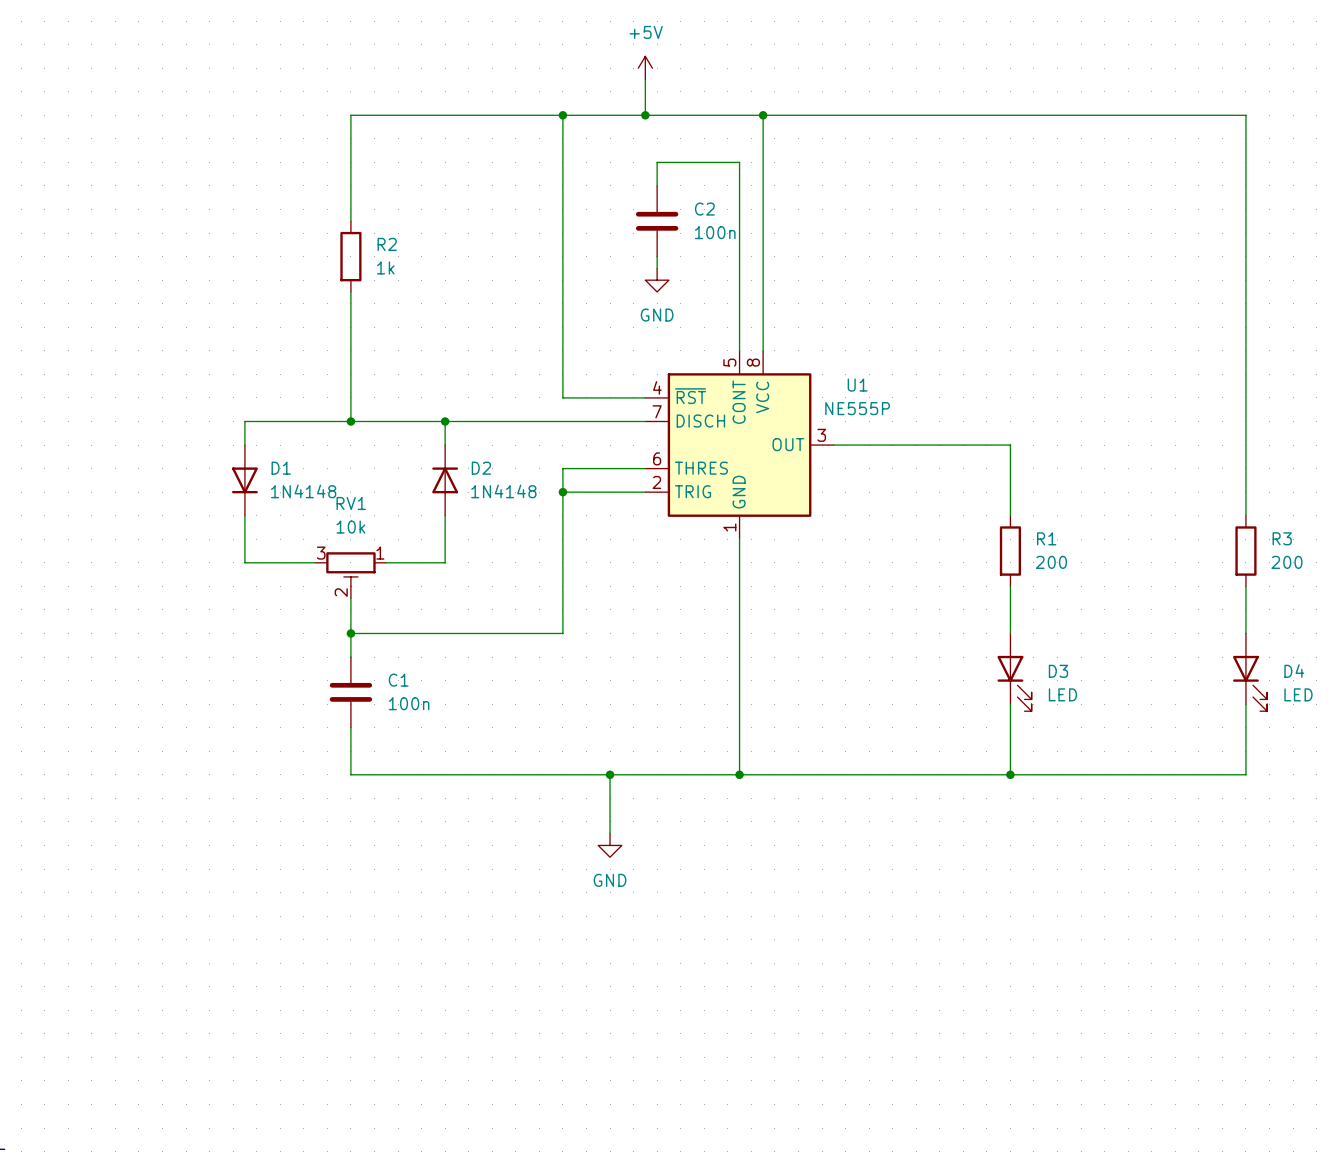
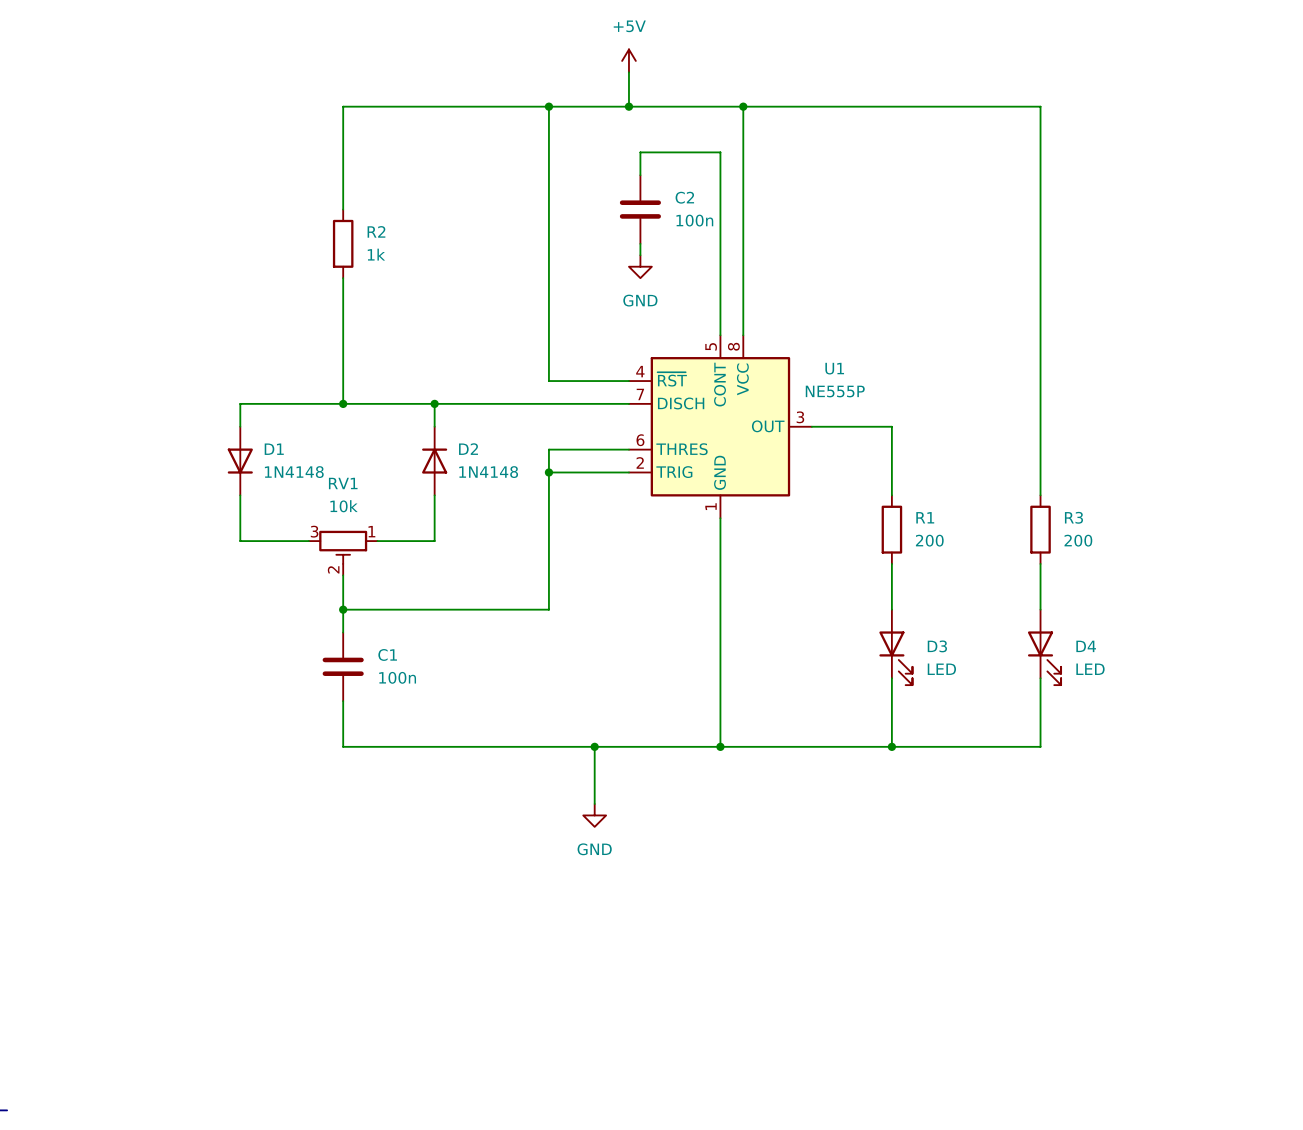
wire: (1069, 115) (1245, 115) (1245, 515) -> (1040, 106) (1040, 495)
wire: (916, 445) (1010, 445) (1010, 515) -> (891, 426) (891, 495)
R1 position: (1010, 551) -> (891, 529)
R3 position: (1245, 551) -> (1040, 529)
wire: none -> (891, 563) (891, 609)
wire: (1010, 586) (1010, 633) -> (1040, 563) (1040, 609)
wire: (1245, 586) (1245, 633) -> none
D3 position: (1014, 672) -> (895, 647)
D4 position: (1250, 672) -> (1044, 647)
wire: (1010, 704) (1010, 774) -> (891, 678) (891, 746)
wire: (1245, 704) (1245, 774) (1069, 774) -> (1040, 678) (1040, 746)
junction: none -> (891, 746)
junction: (1010, 774) -> none

